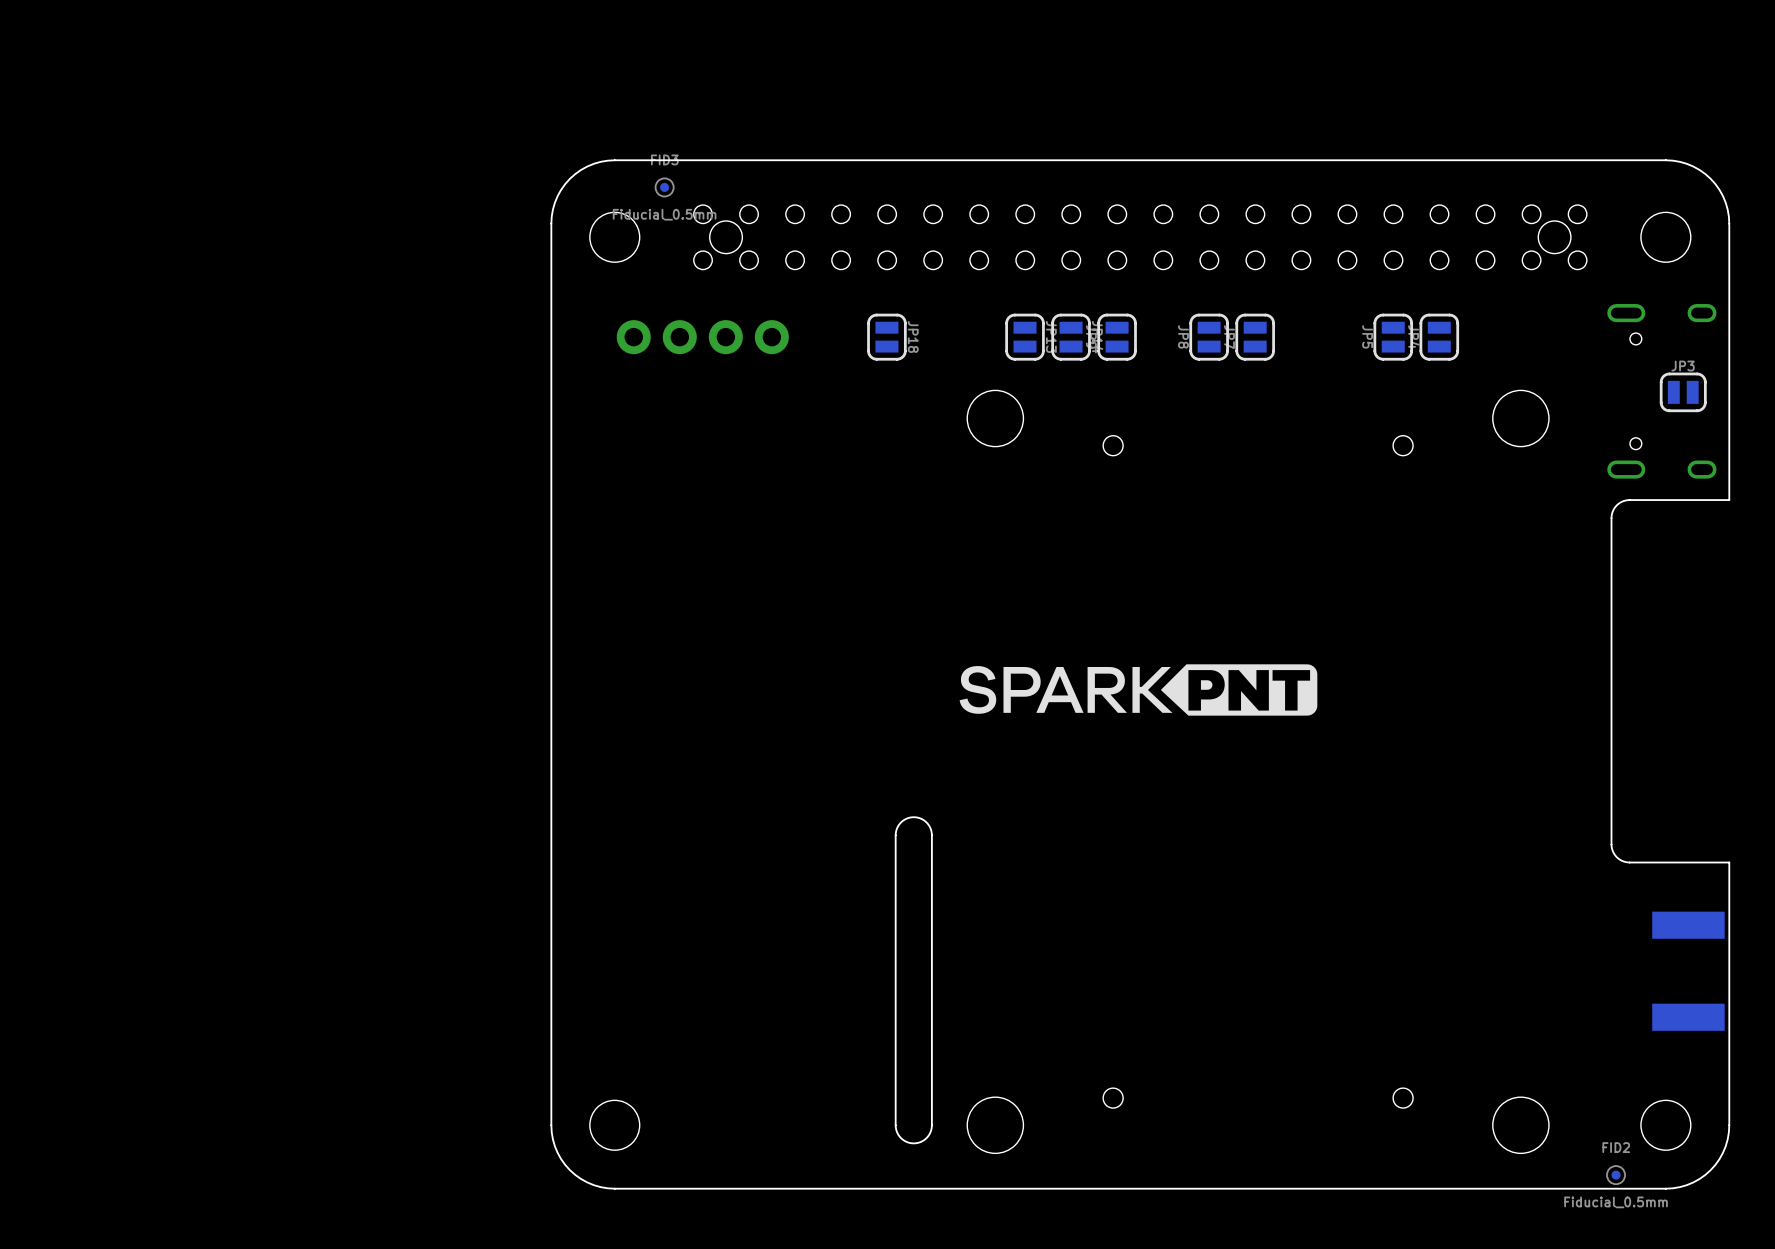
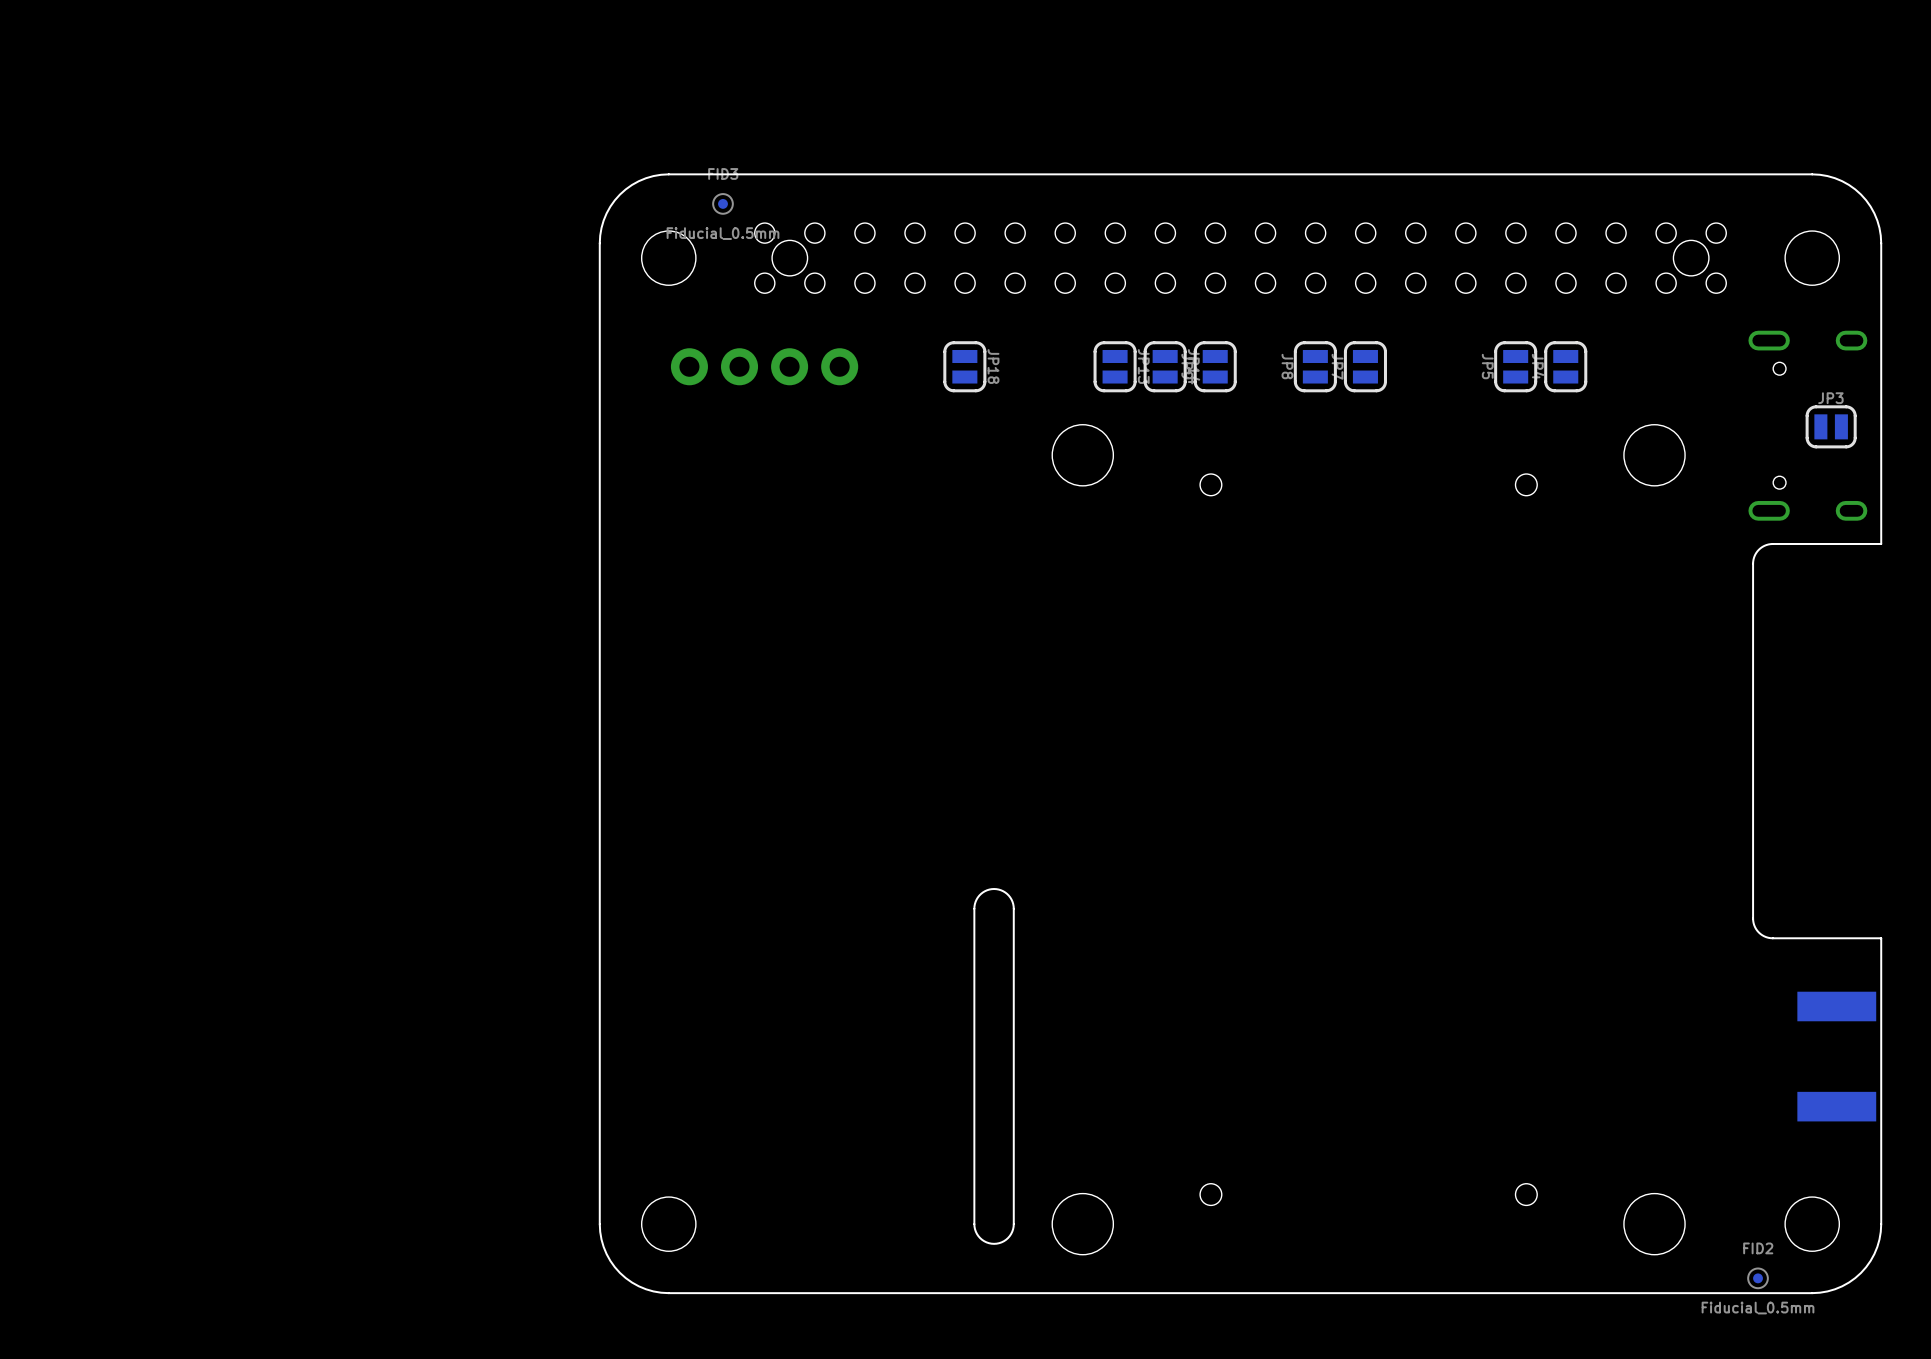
drawing: [959, 664, 1318, 716] -> none

